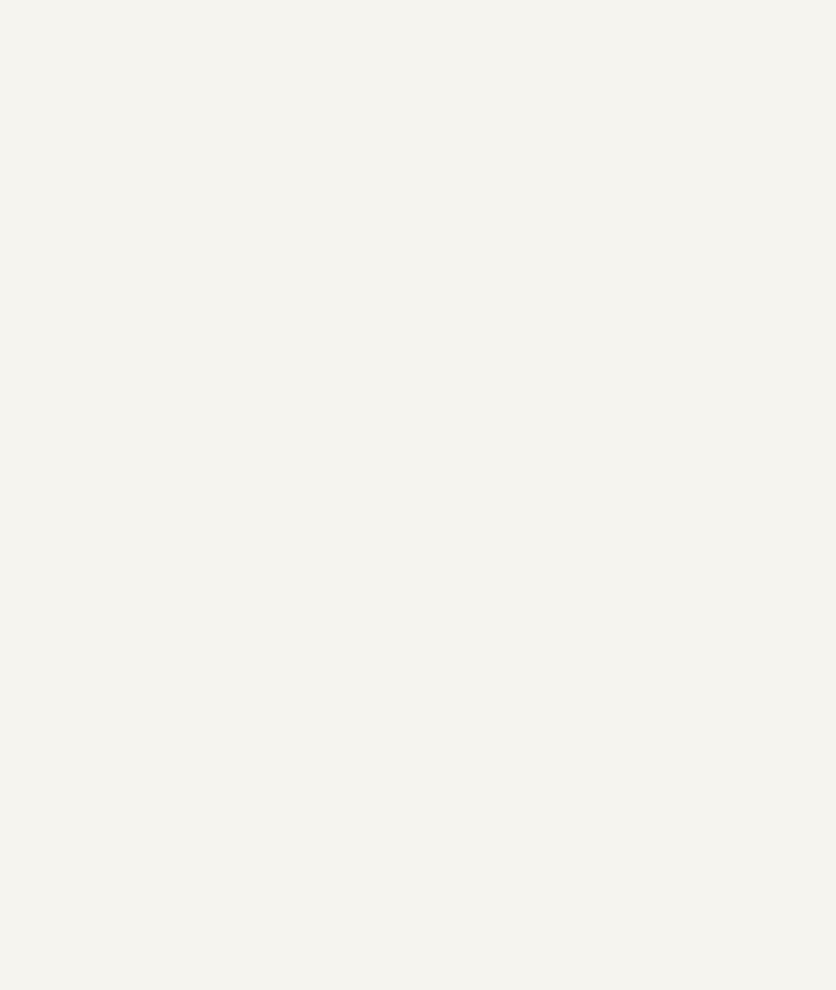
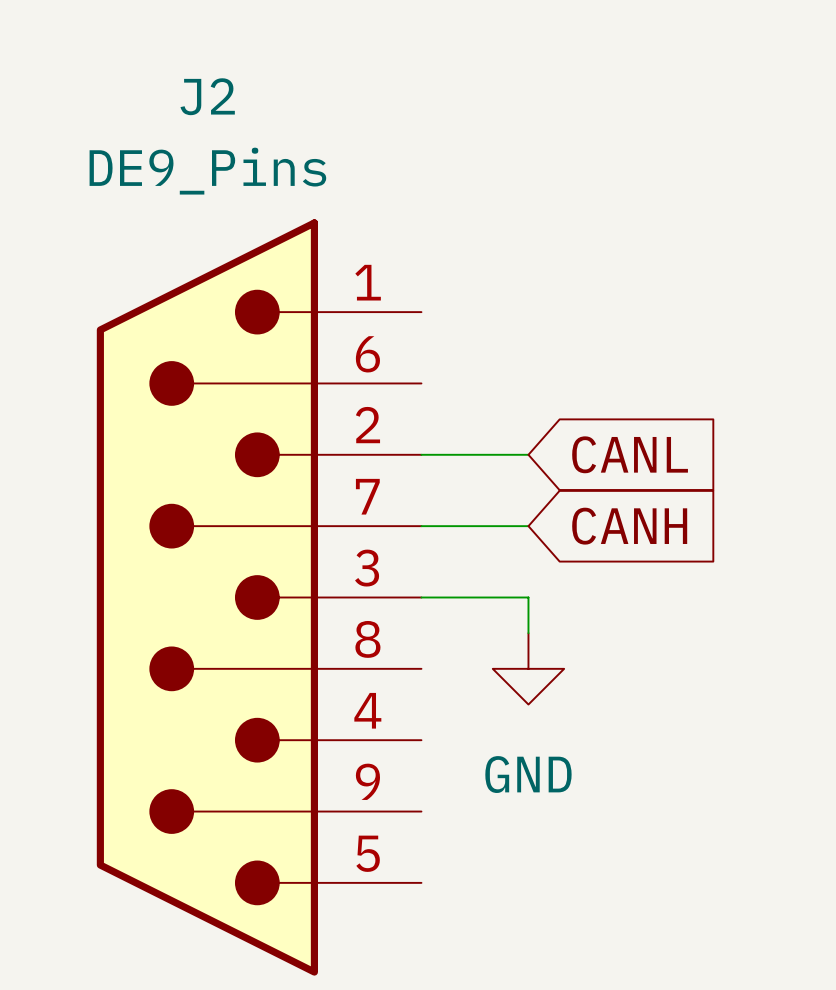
wire: none -> (421, 454) (528, 454)
global label: none -> CANL (630, 454)
wire: none -> (421, 526) (528, 526)
global label: none -> CANH (629, 526)
J2: none -> DE9_Pins (259, 597)
wire: none -> (421, 597) (528, 597) (528, 633)
power symbol: none -> GND (528, 668)

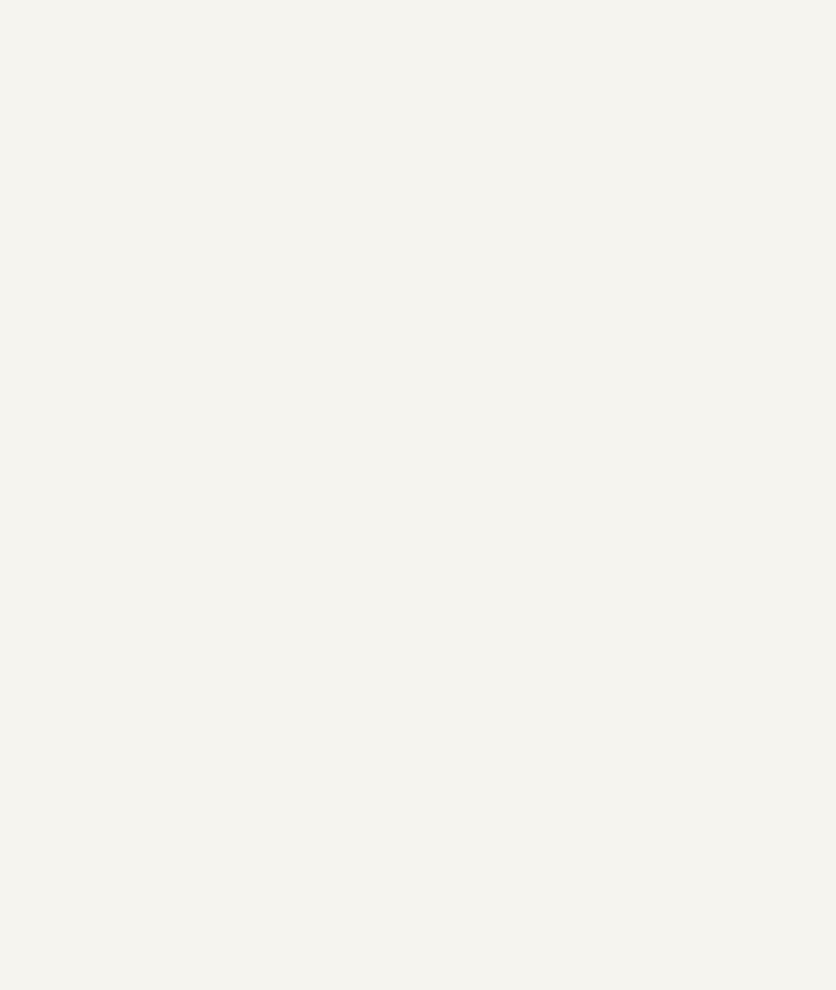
wire: (421, 454) (528, 454) -> none
global label: CANL (630, 454) -> none
wire: (421, 526) (528, 526) -> none
global label: CANH (629, 526) -> none
J2: DE9_Pins (259, 597) -> none
wire: (421, 597) (528, 597) (528, 633) -> none
power symbol: GND (528, 668) -> none

